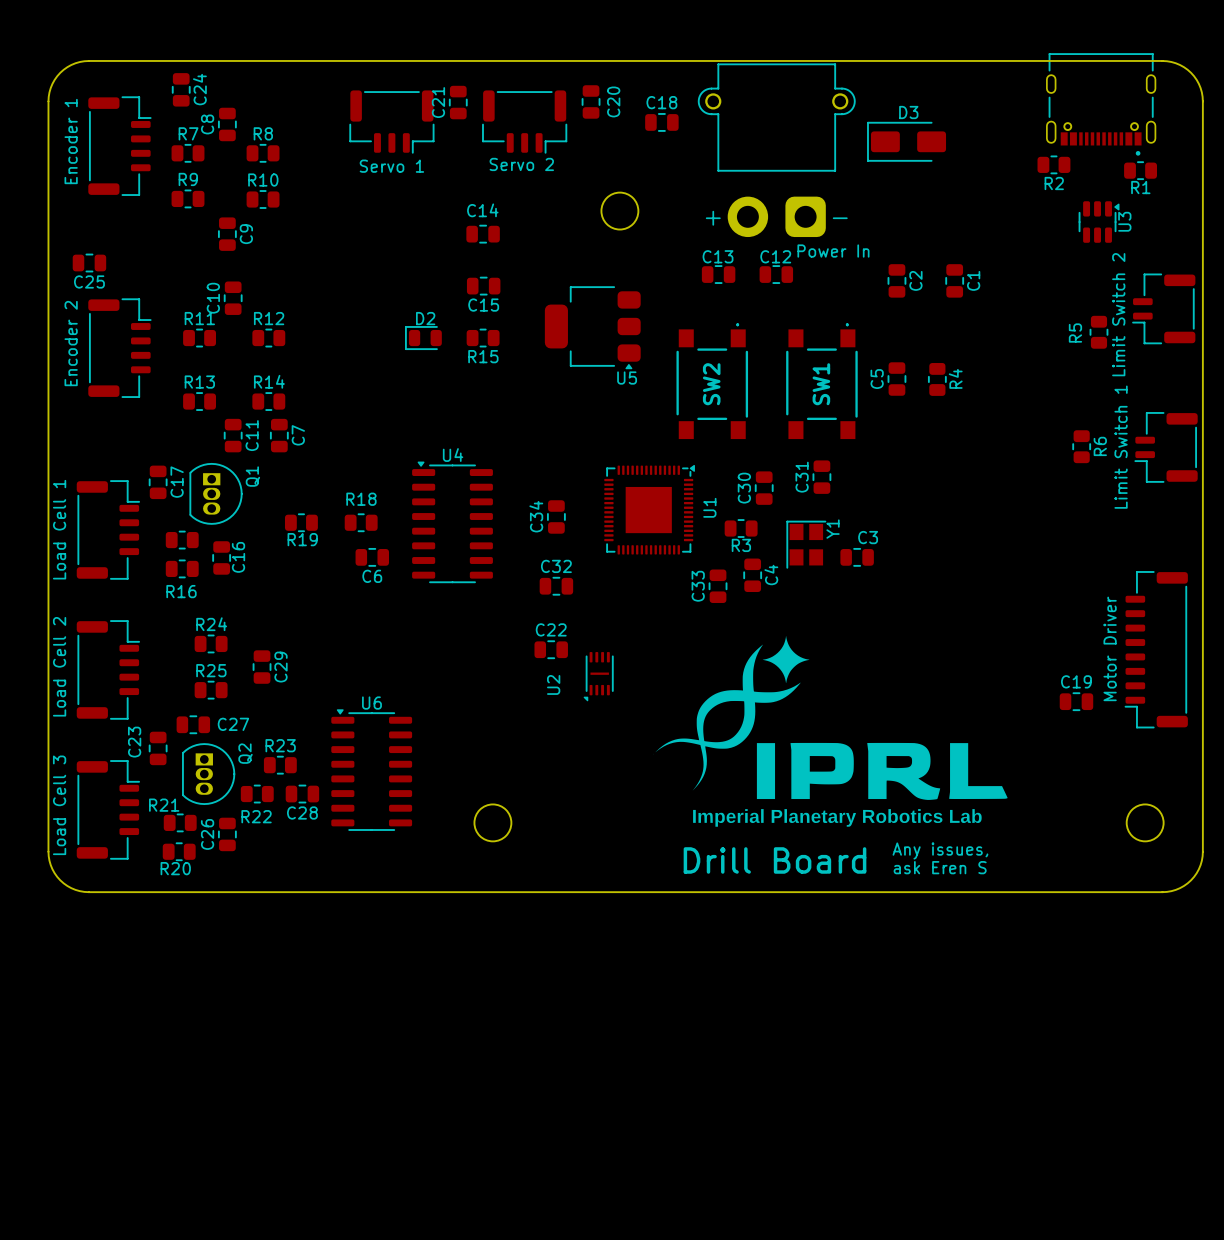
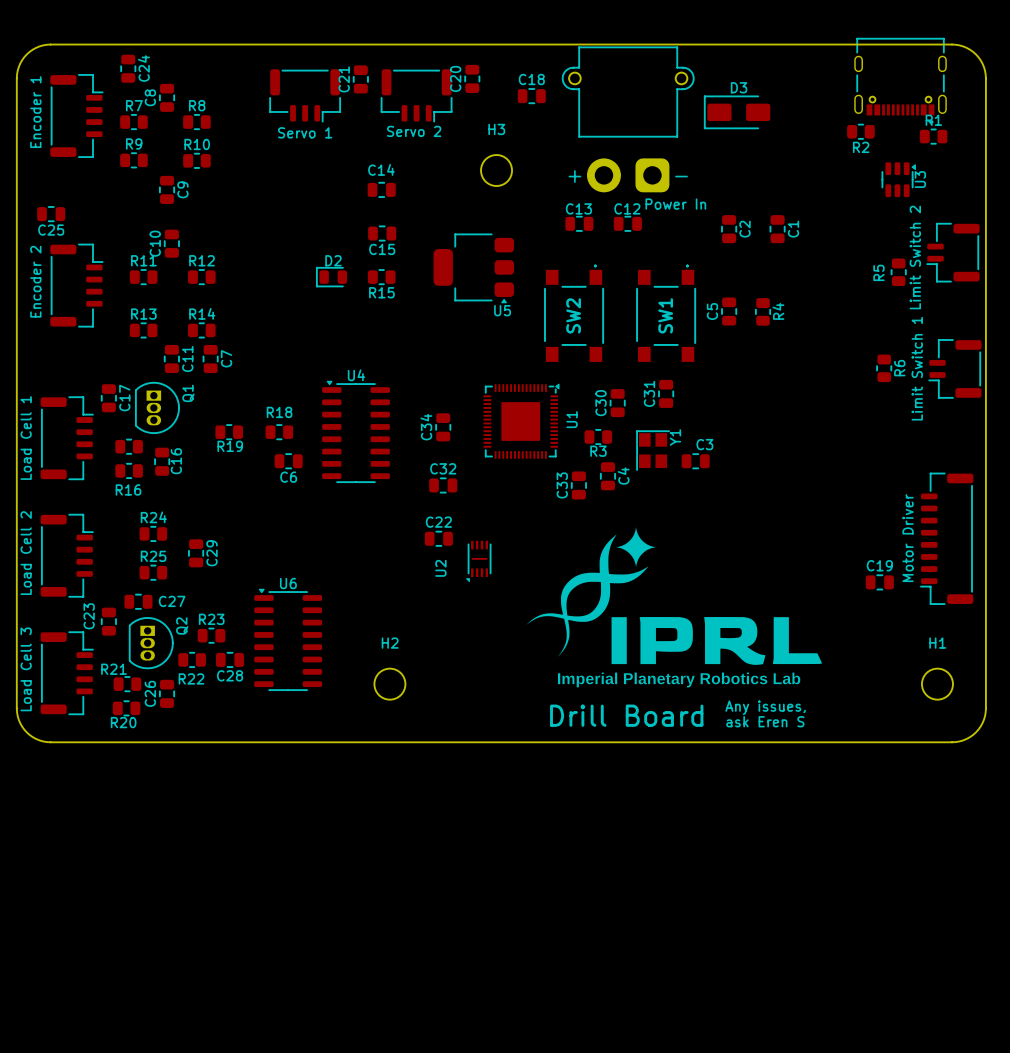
C20 name position: C20 (613, 101) -> C20 (455, 78)
H3 name: none -> H3 (496, 129)
R1 name position: R1 (1140, 187) -> R1 (933, 120)
H2 name: none -> H2 (390, 643)
H1 name: none -> H1 (937, 643)

